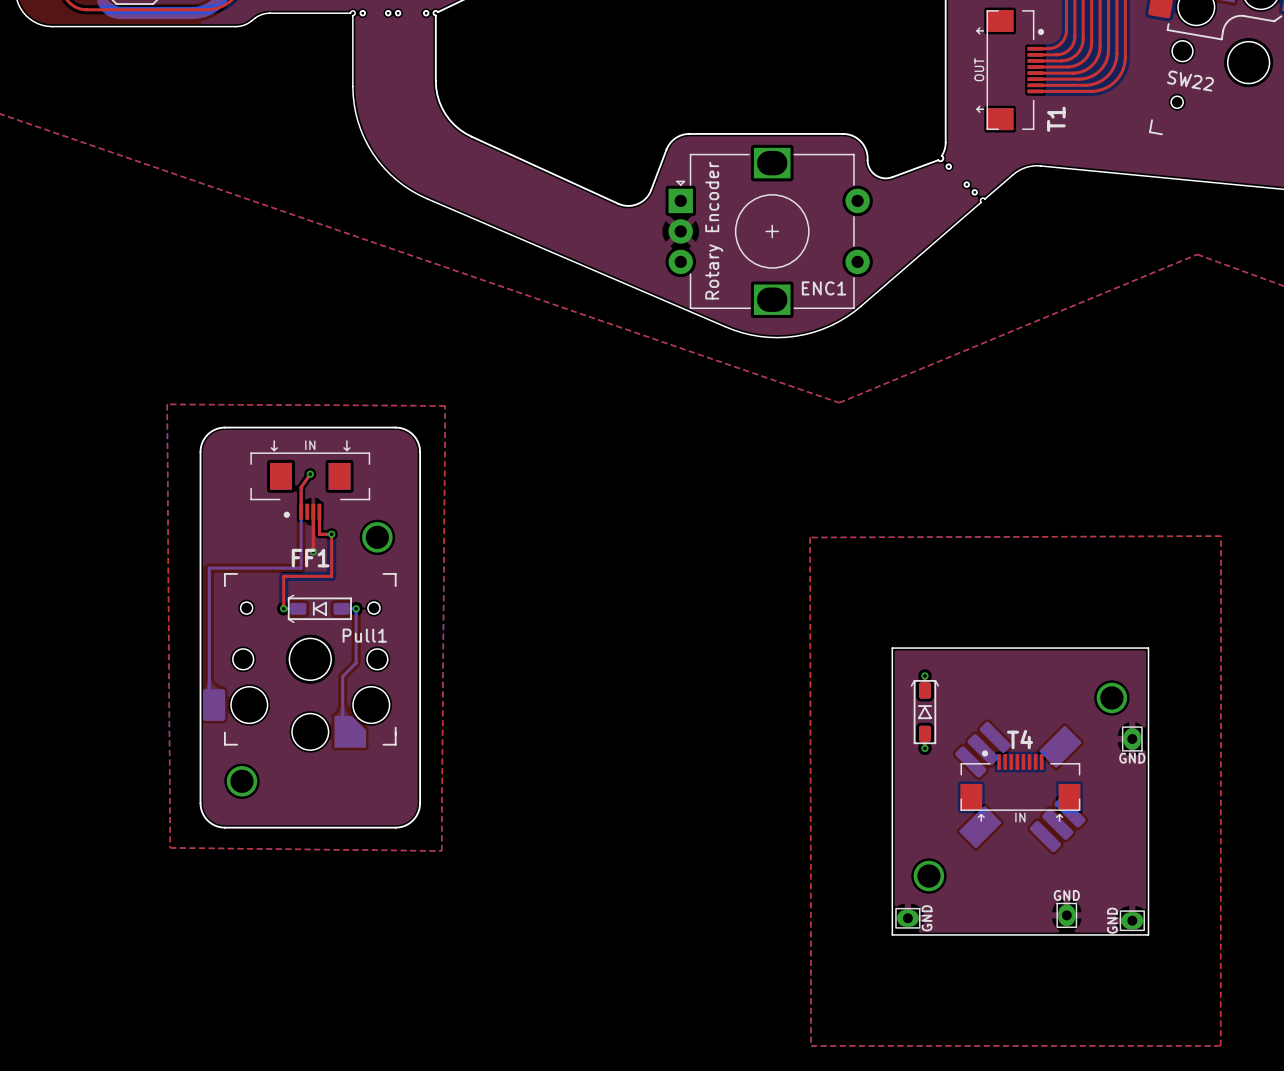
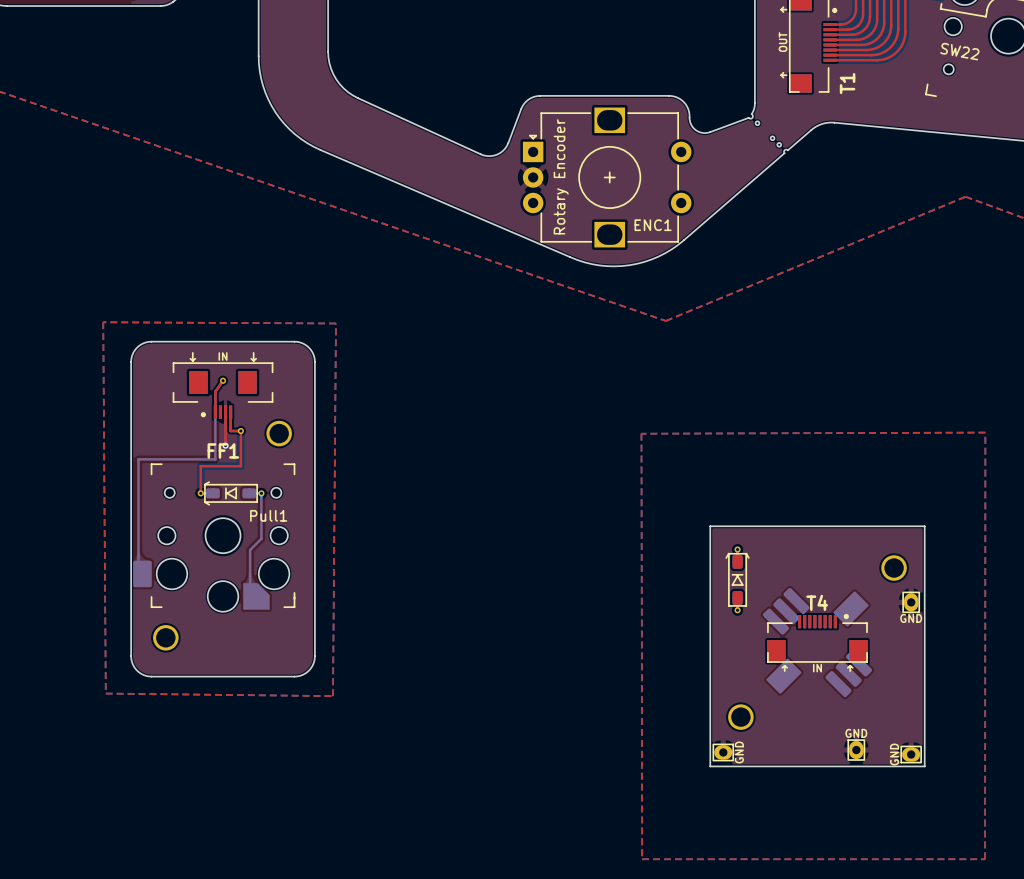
T4 footprint: [960, 750, 1081, 822] -> [767, 613, 868, 672]

